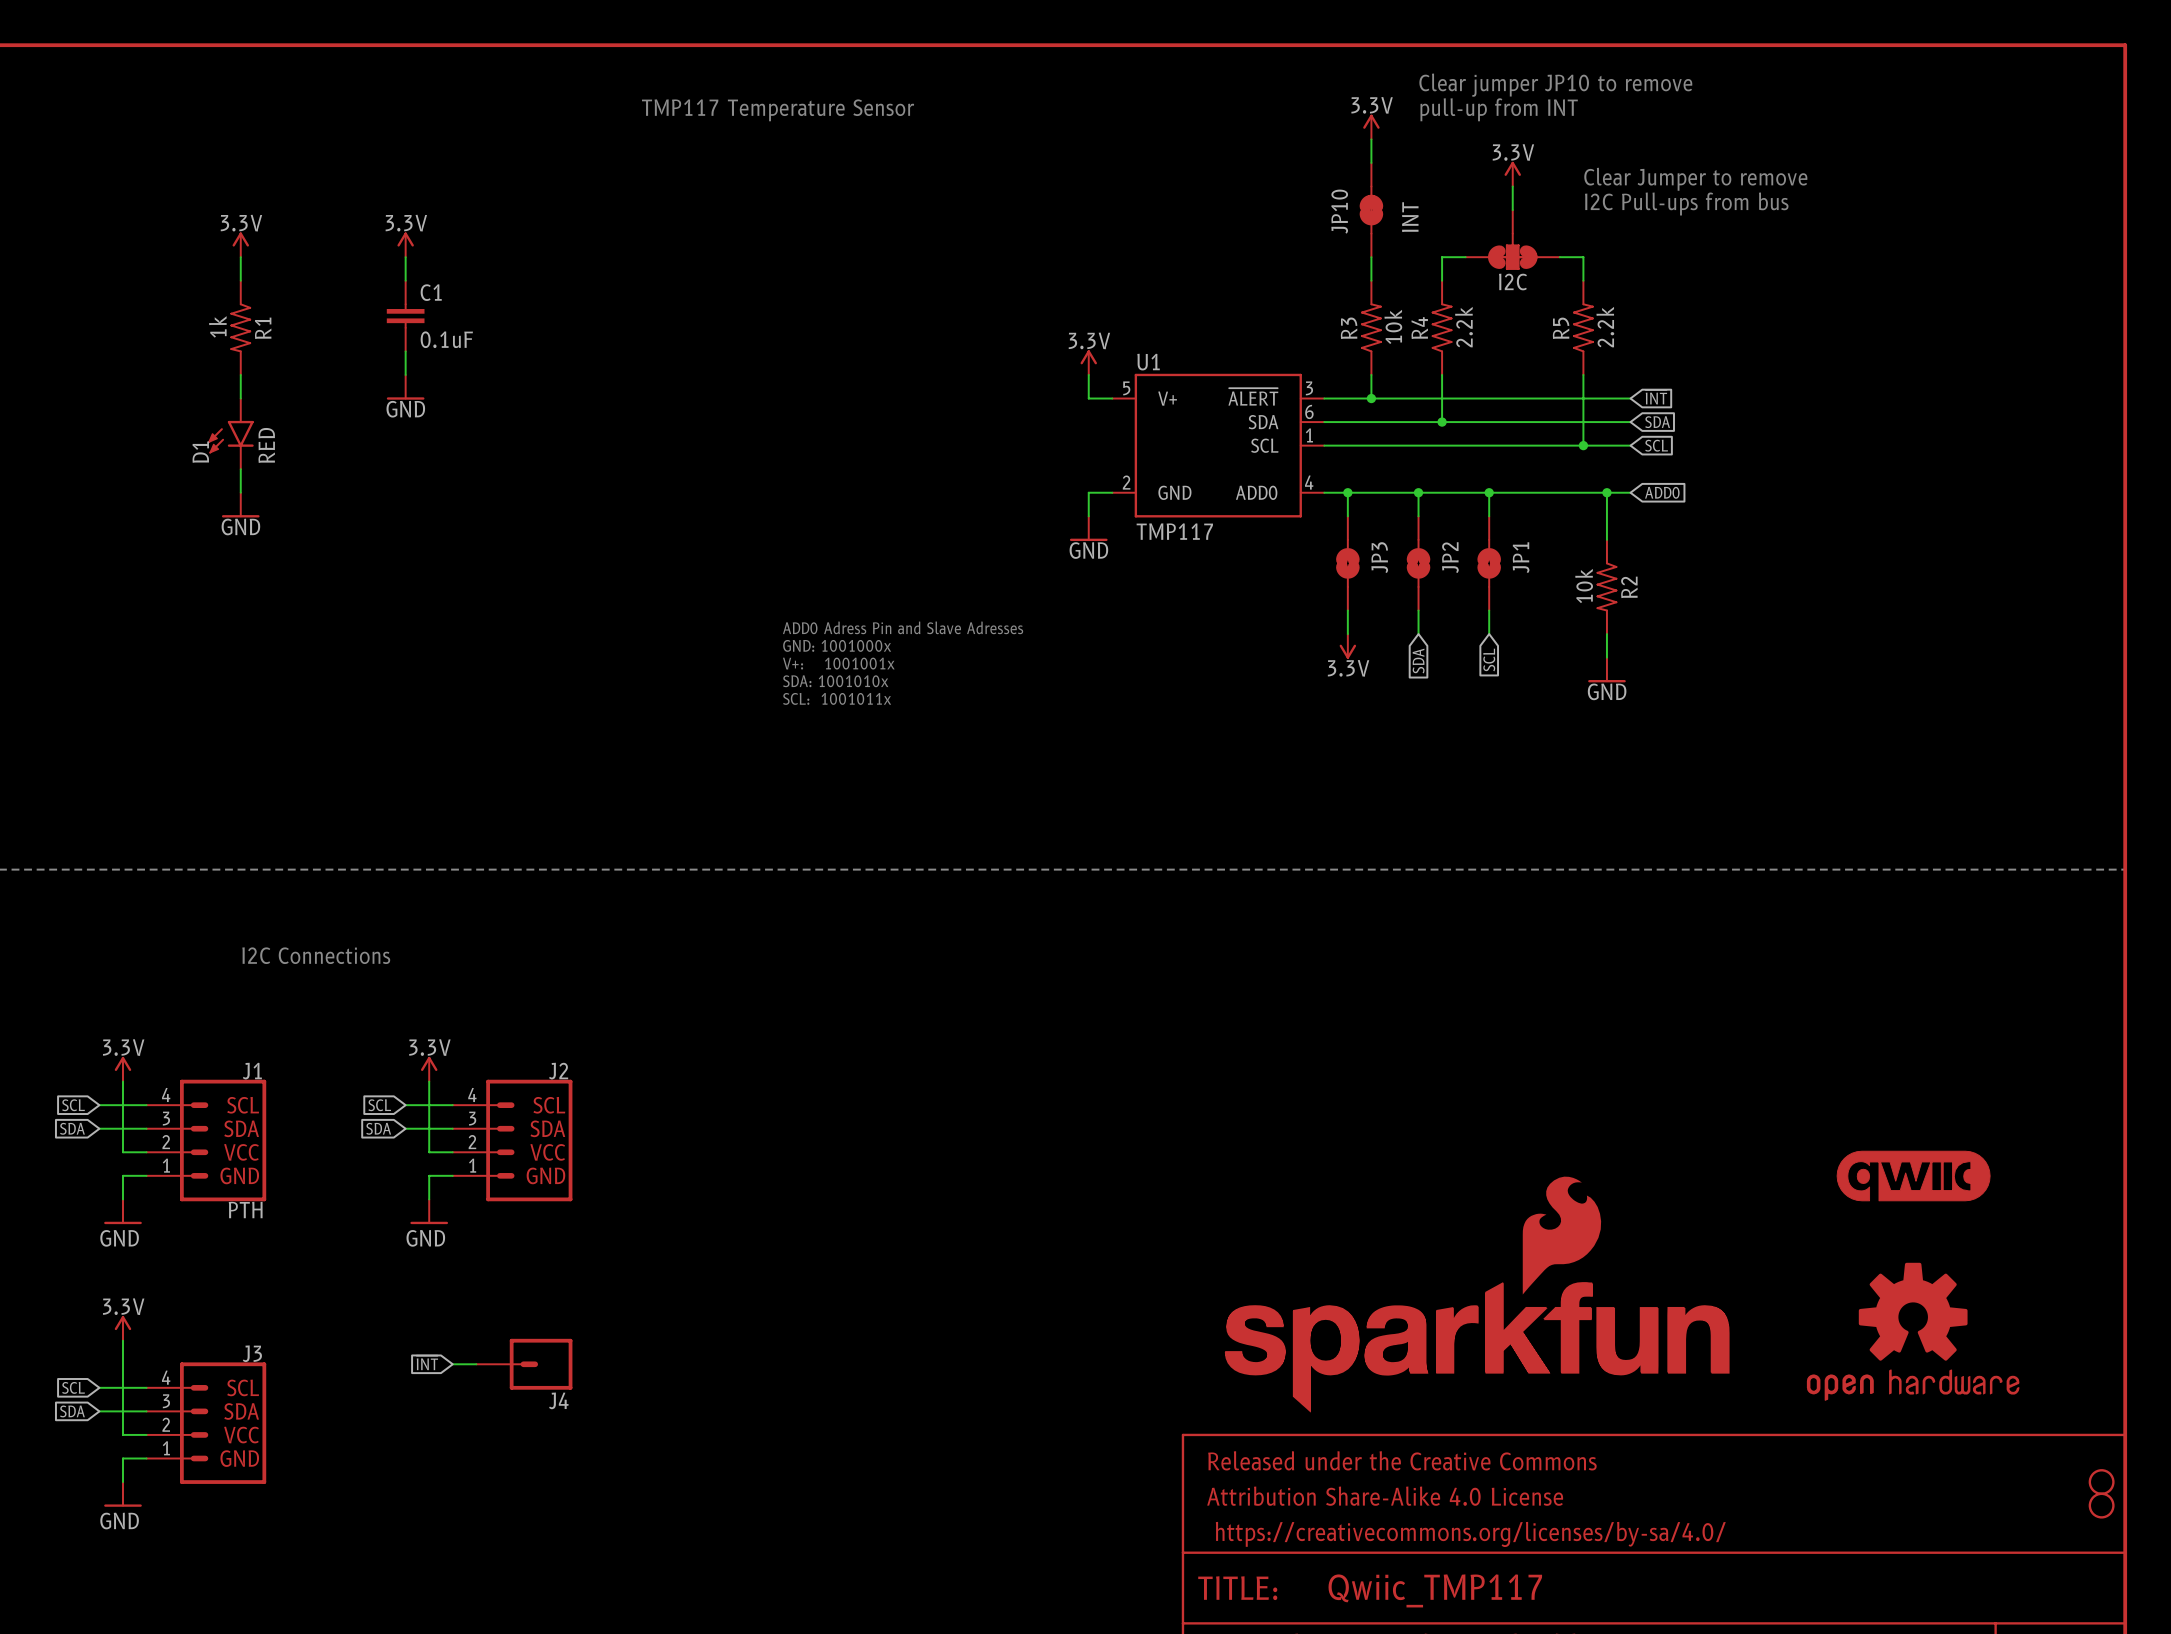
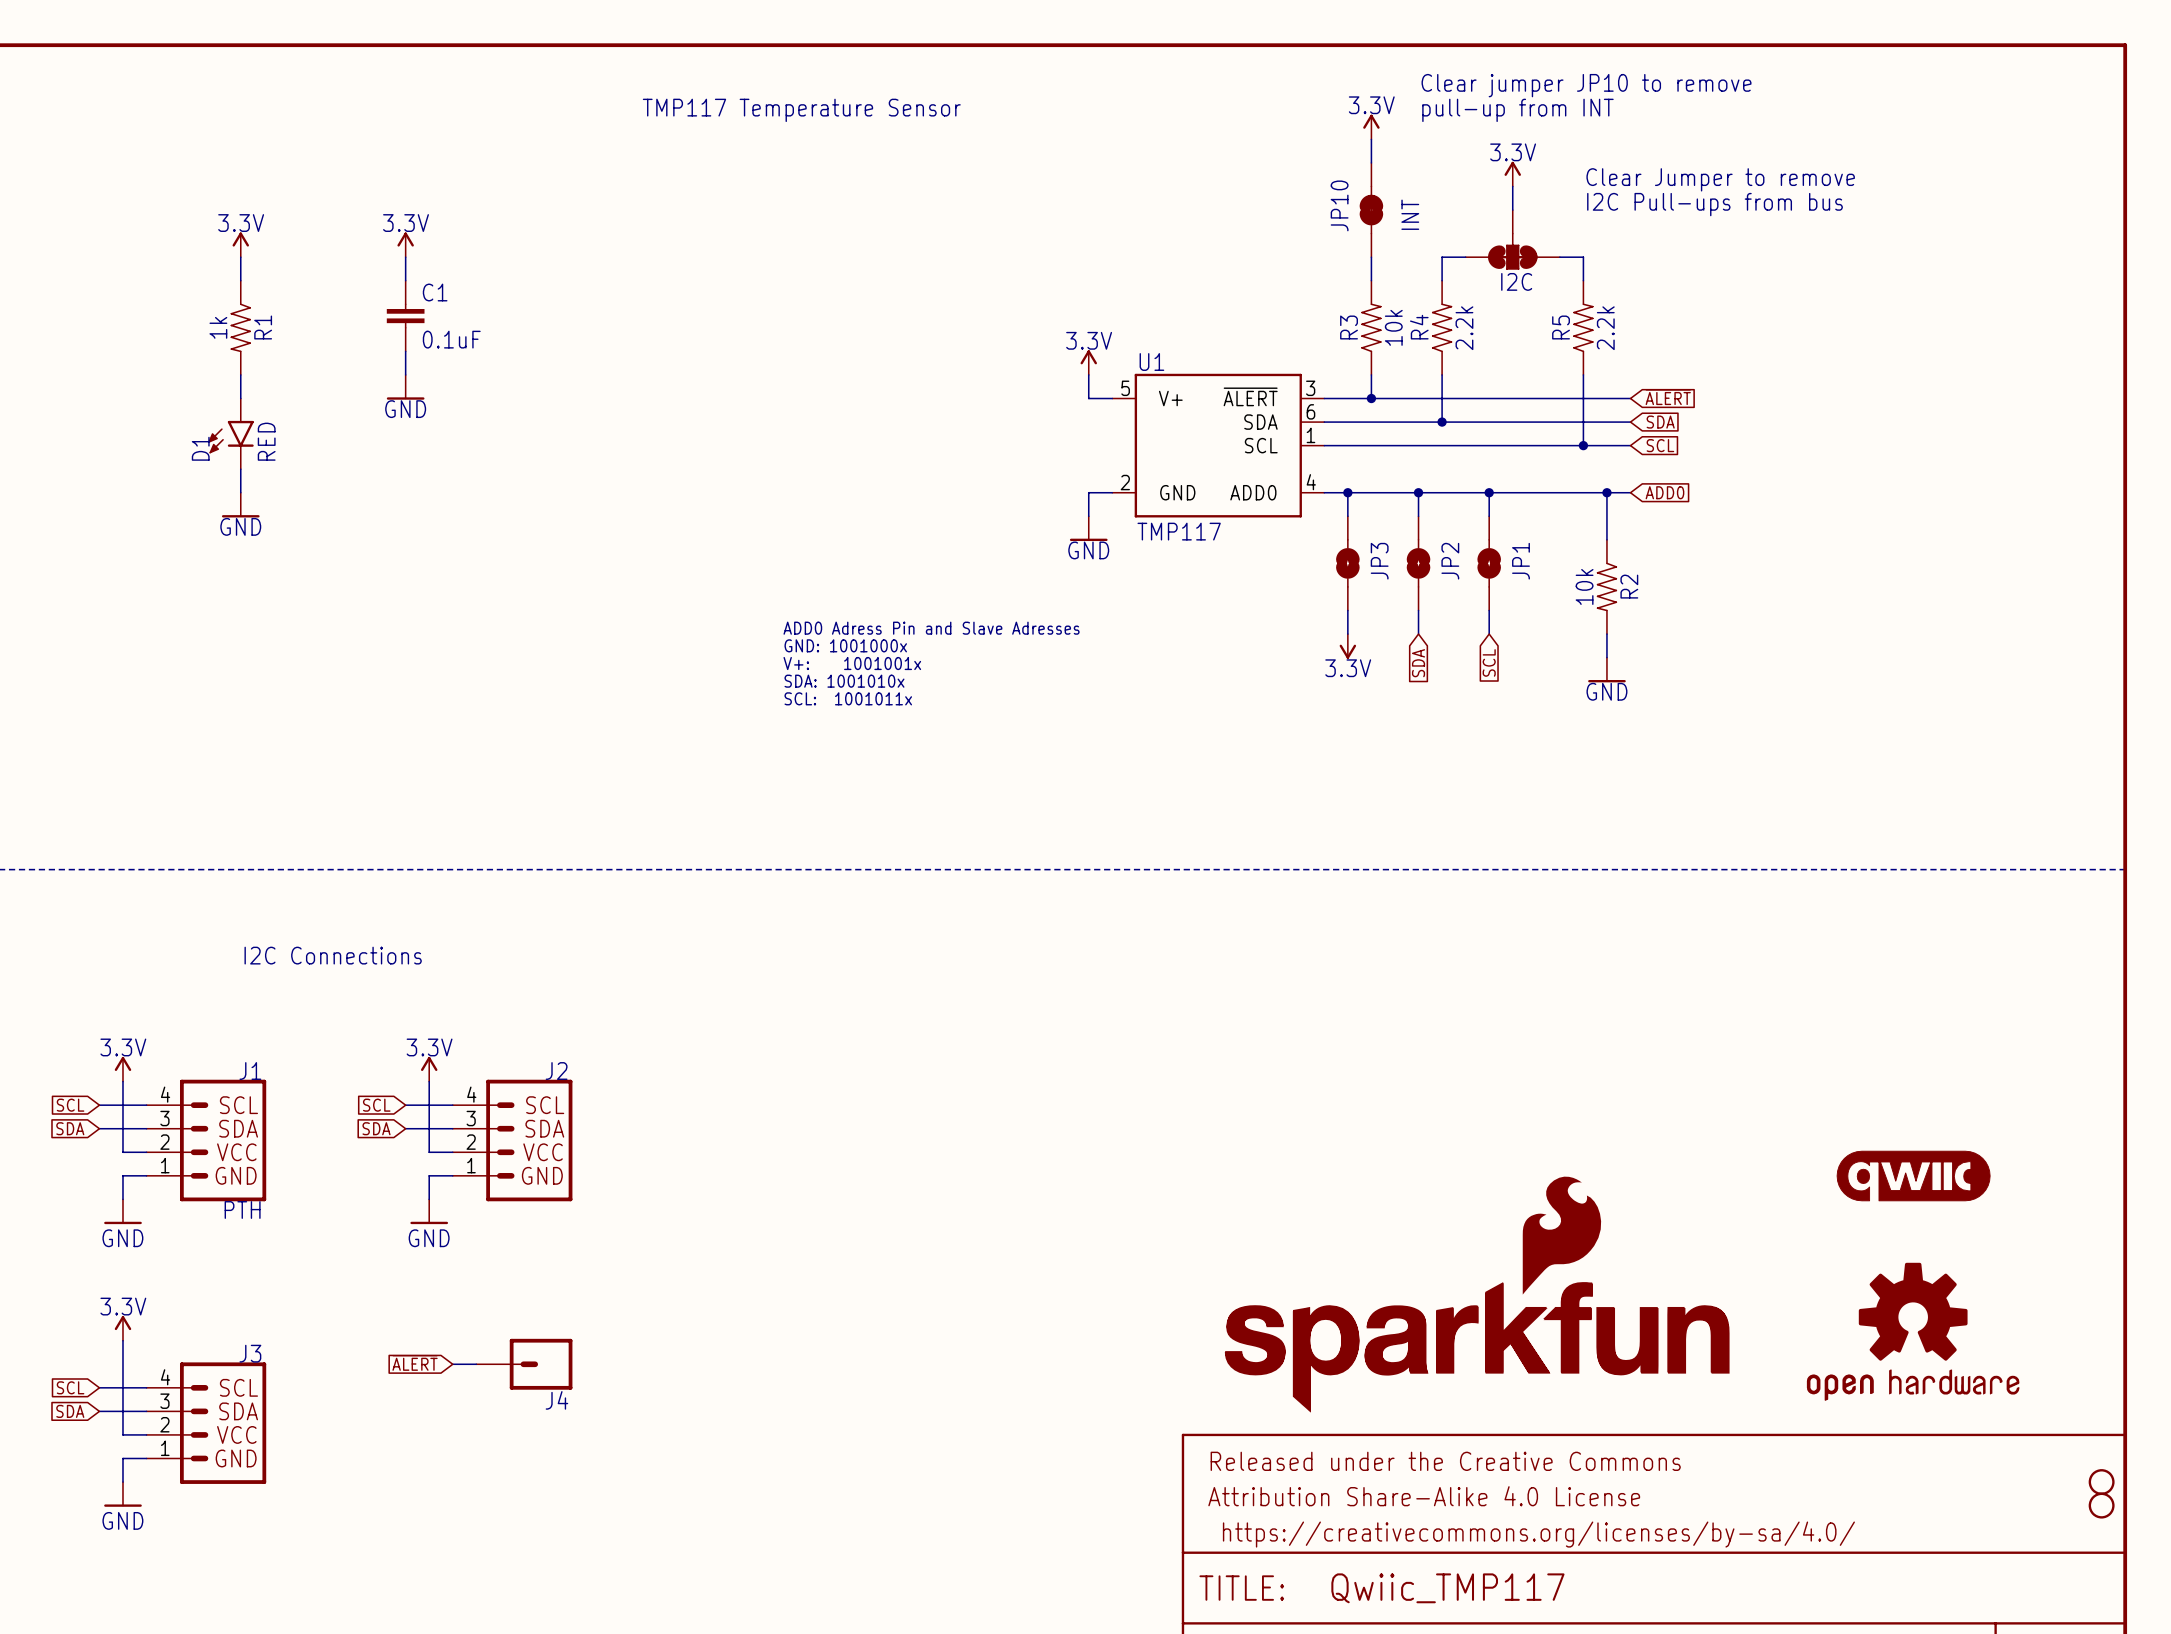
global label: ~{INT} (1656, 397) -> ~{ALERT} (1668, 397)
global label: ~{INT} (427, 1362) -> ~{ALERT} (415, 1362)

